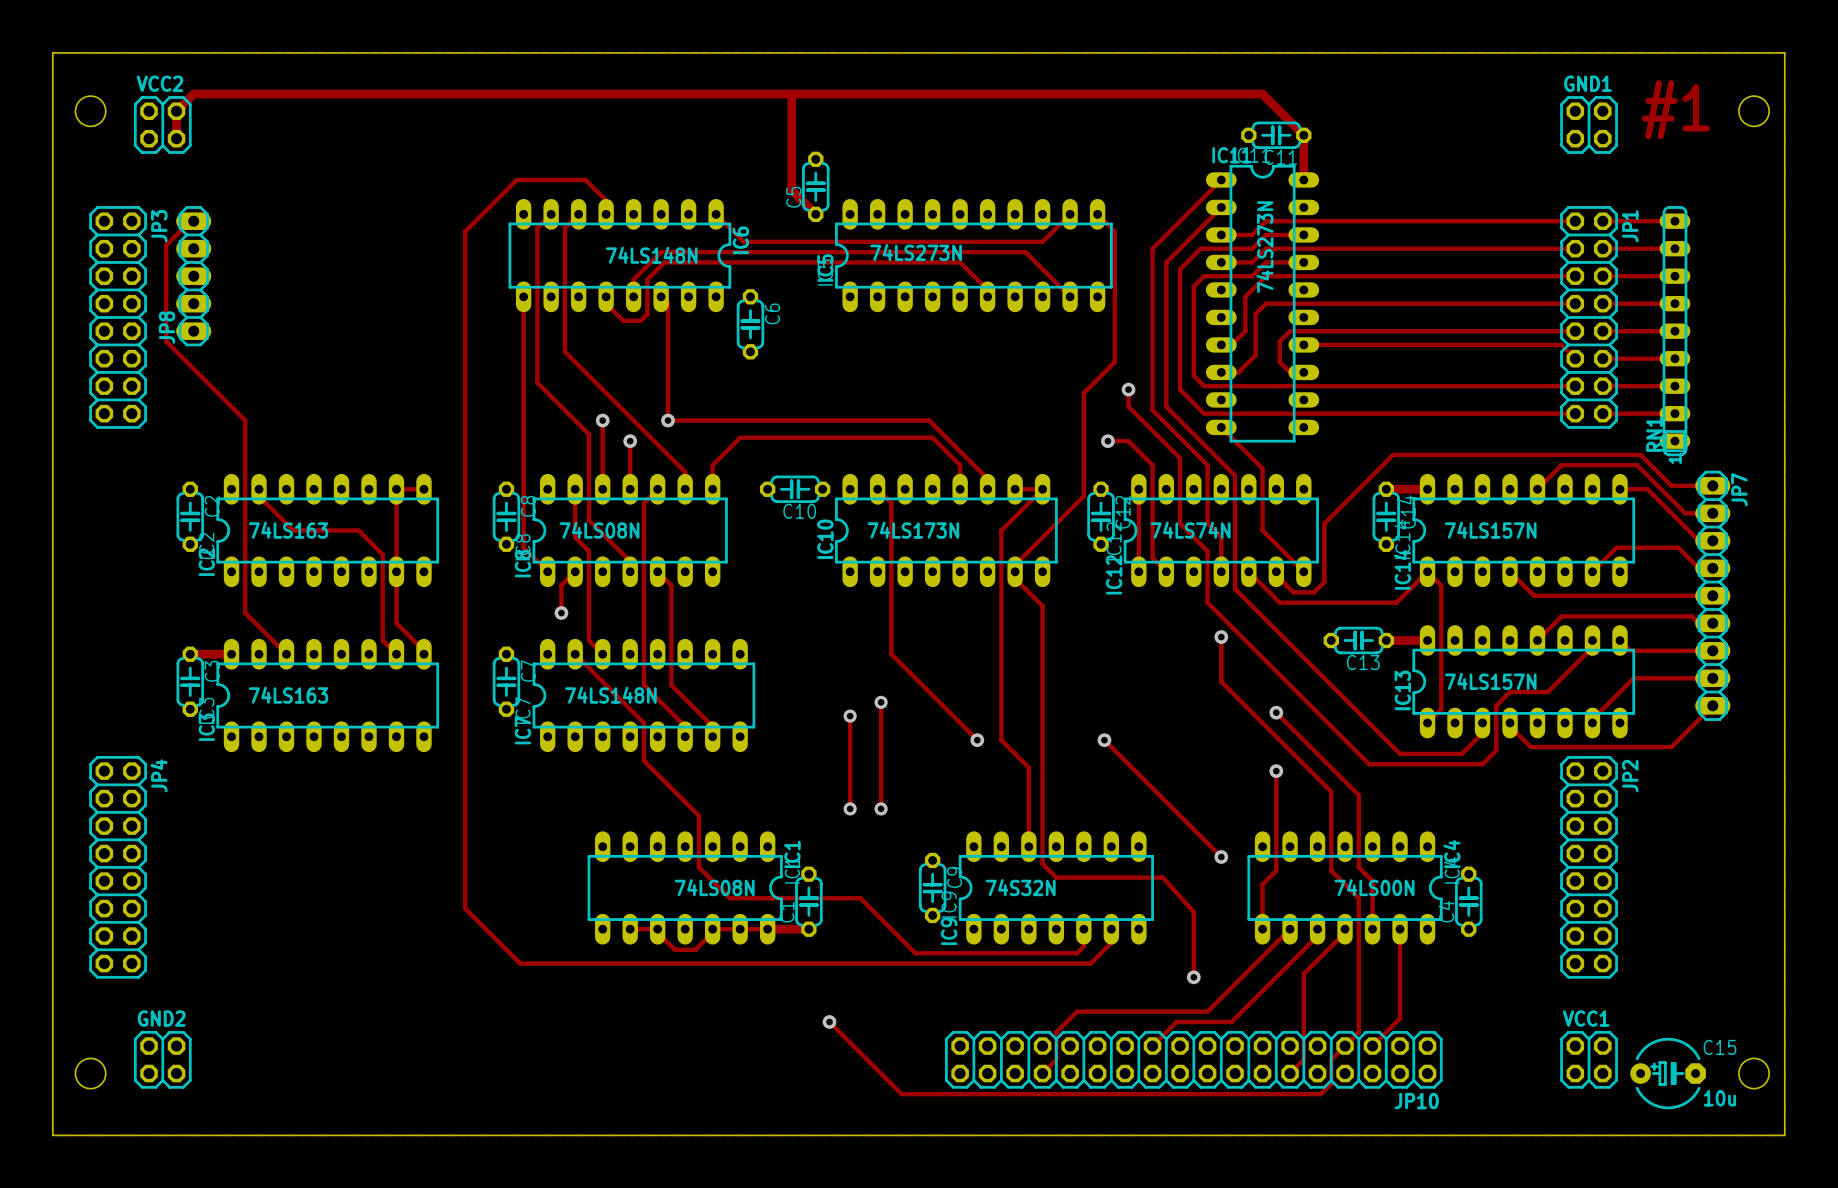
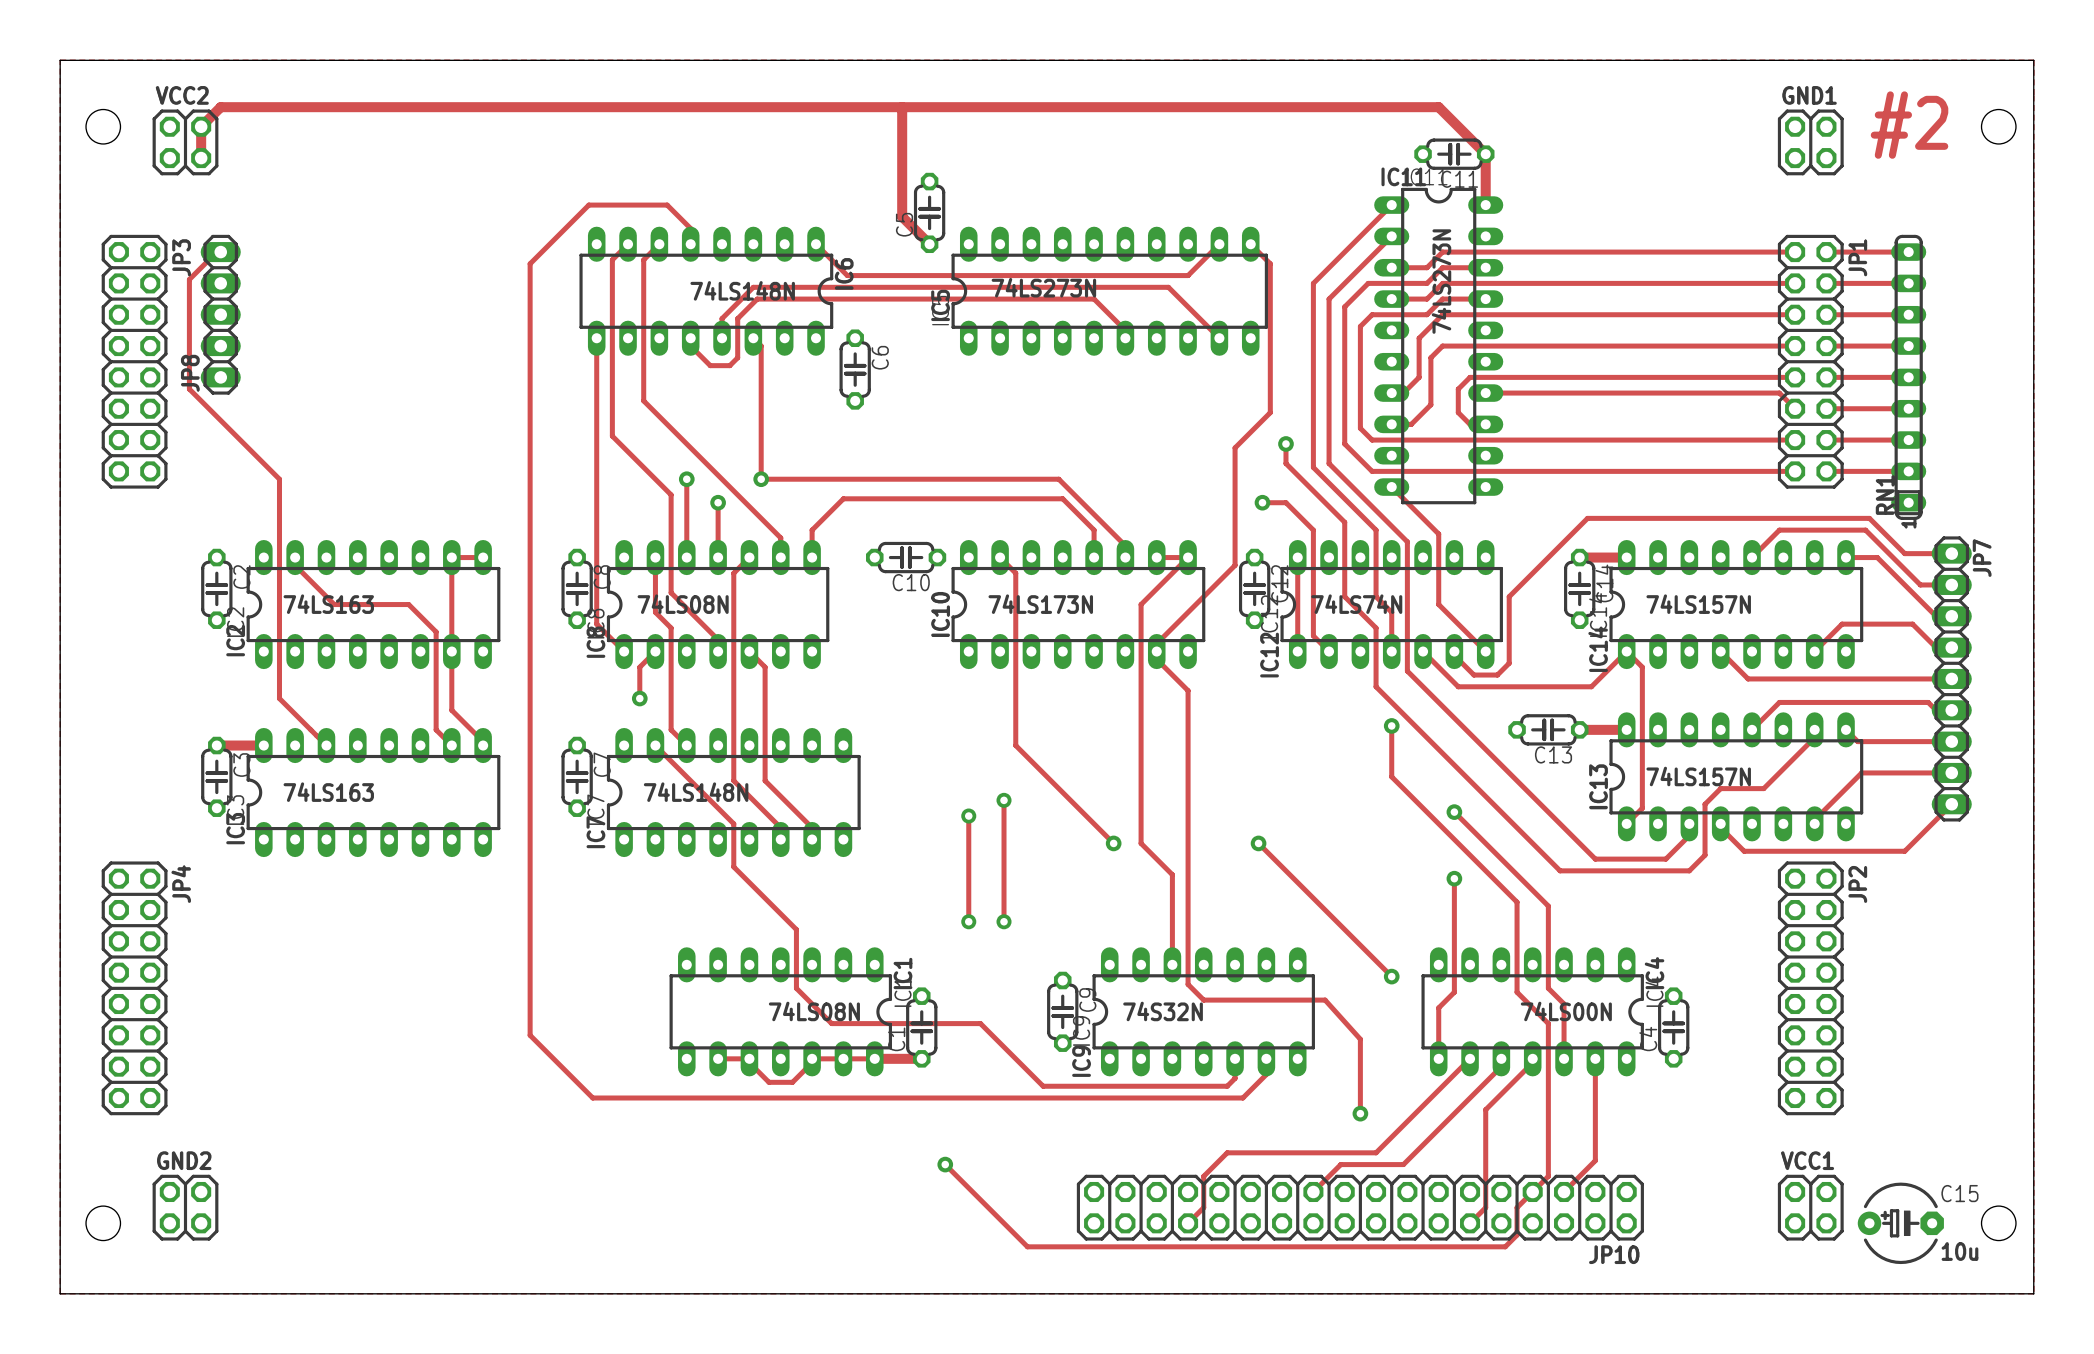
text: #1 (1675, 109) -> #2 (1909, 125)

